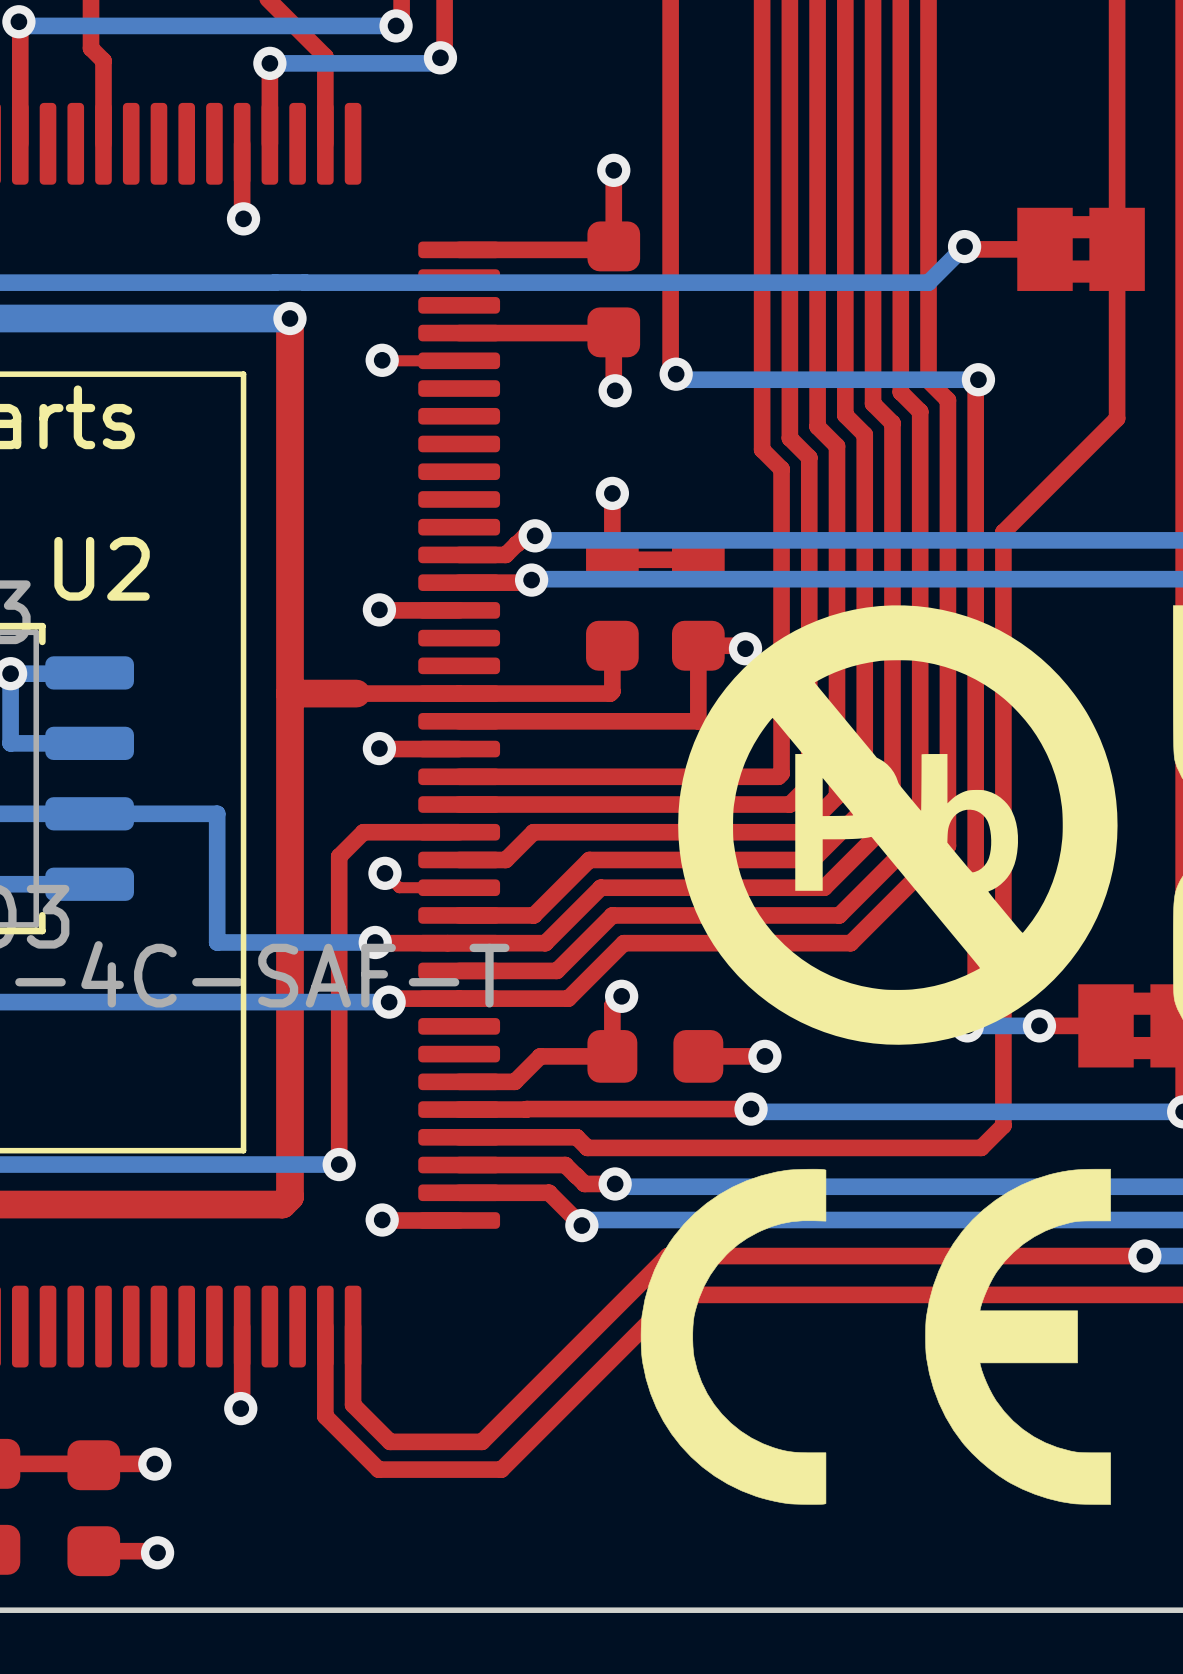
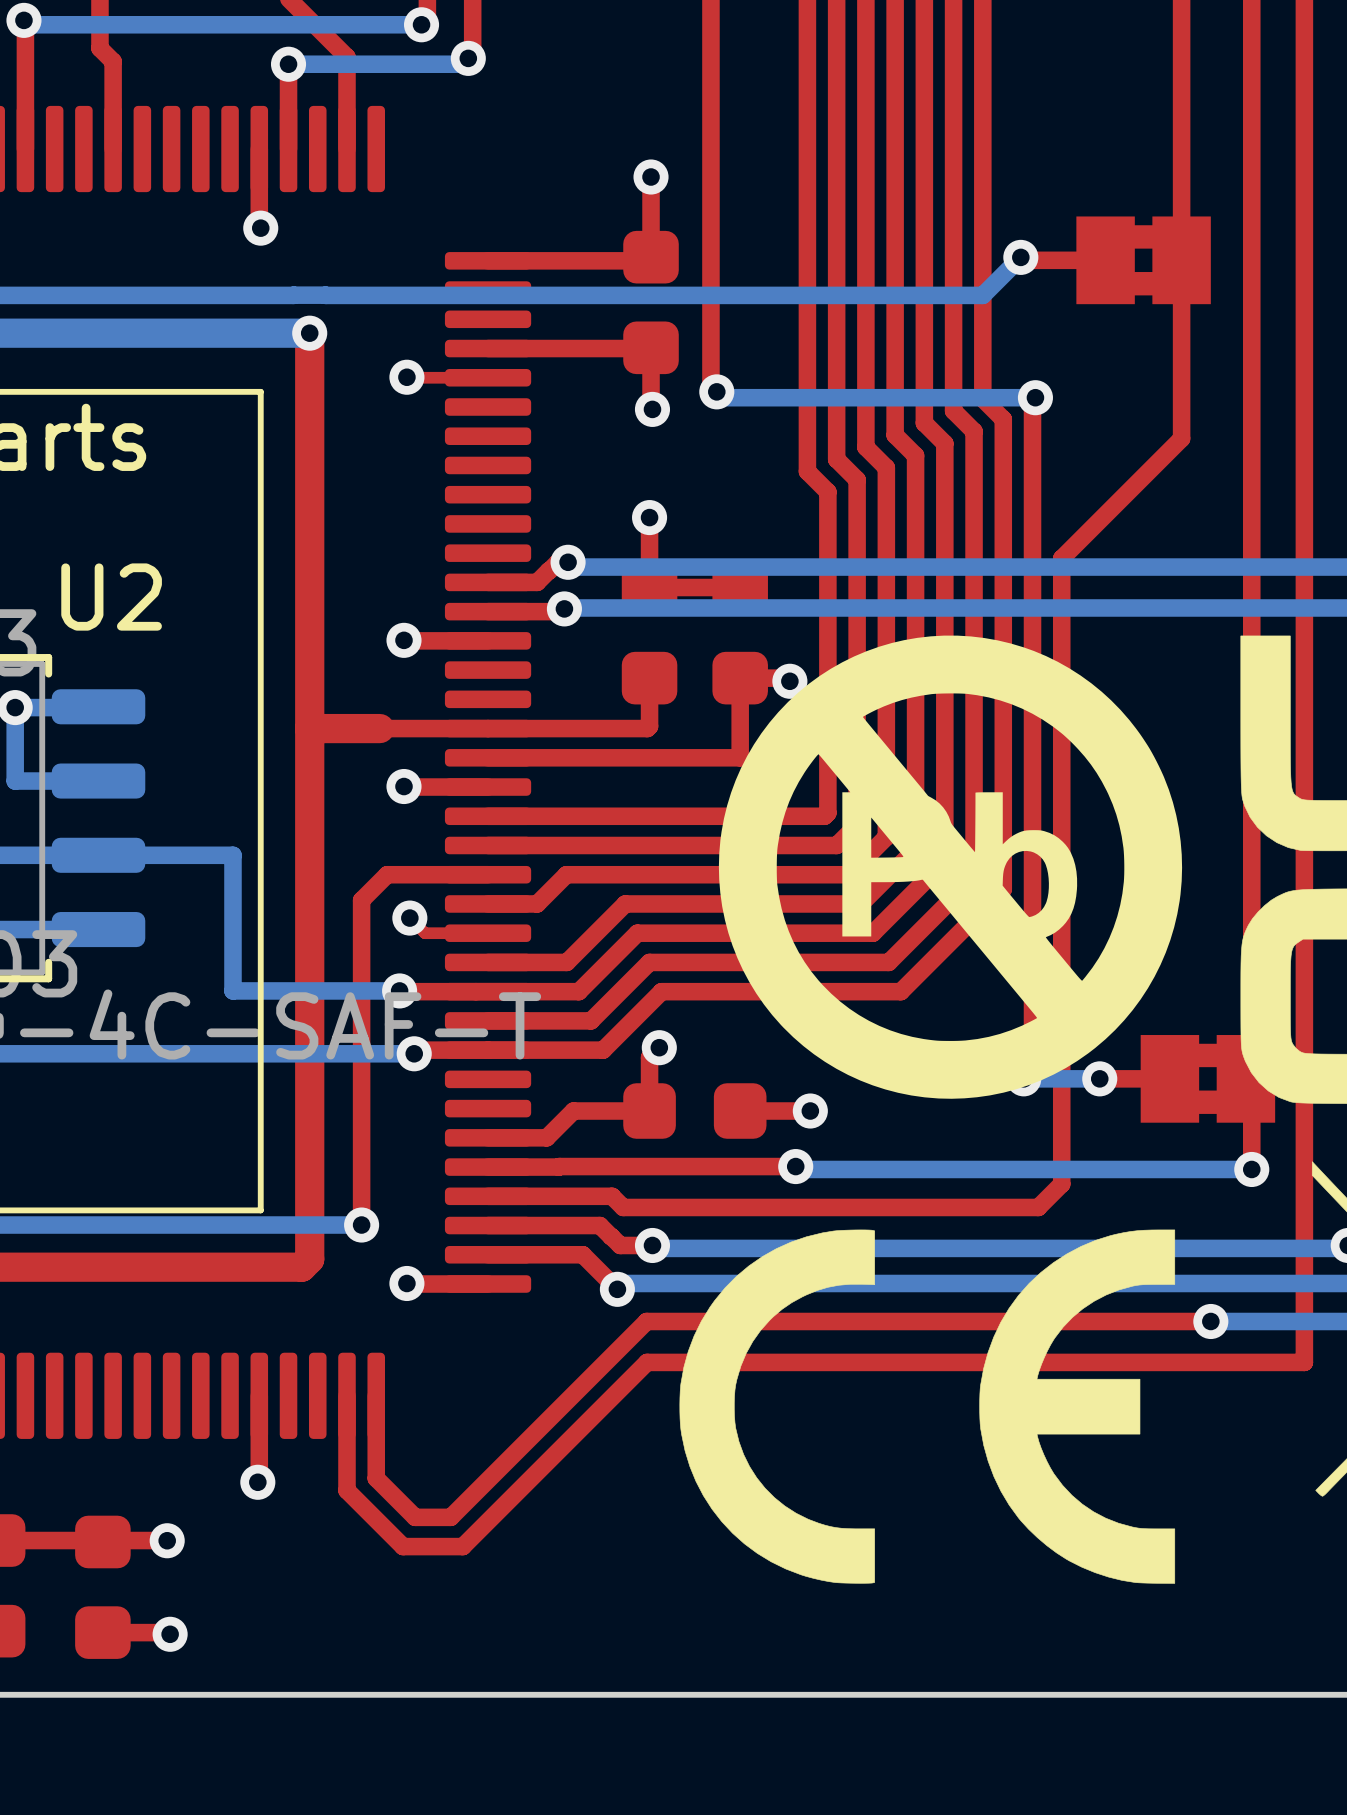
top track: (667, 1256) (482, 1441) (423, 1441) -> (708, 1321) (646, 1321) (450, 1517)
top track: (676, 1294) (501, 1469) (435, 1469) -> (716, 1362) (647, 1362) (462, 1546)

